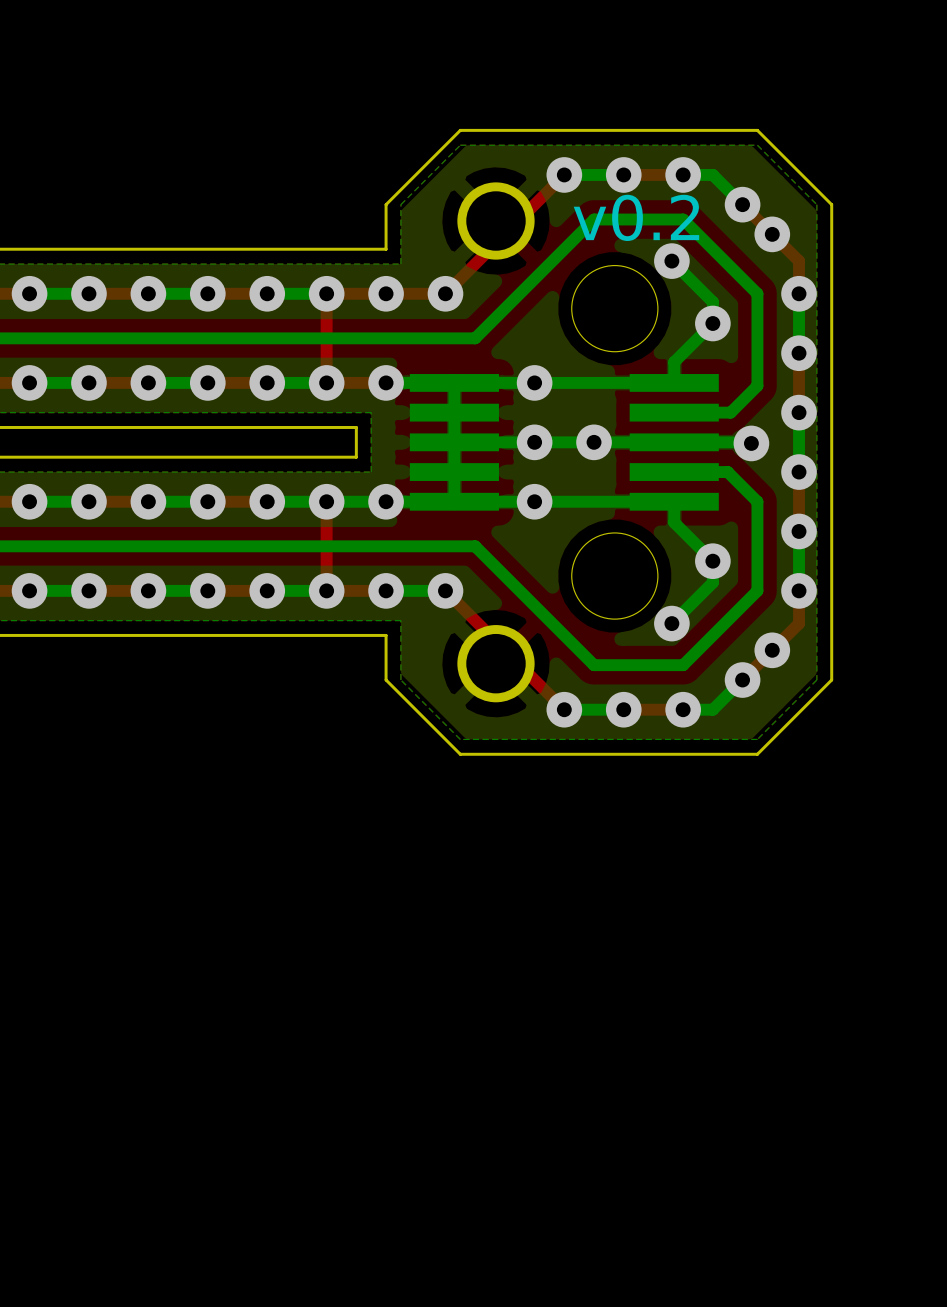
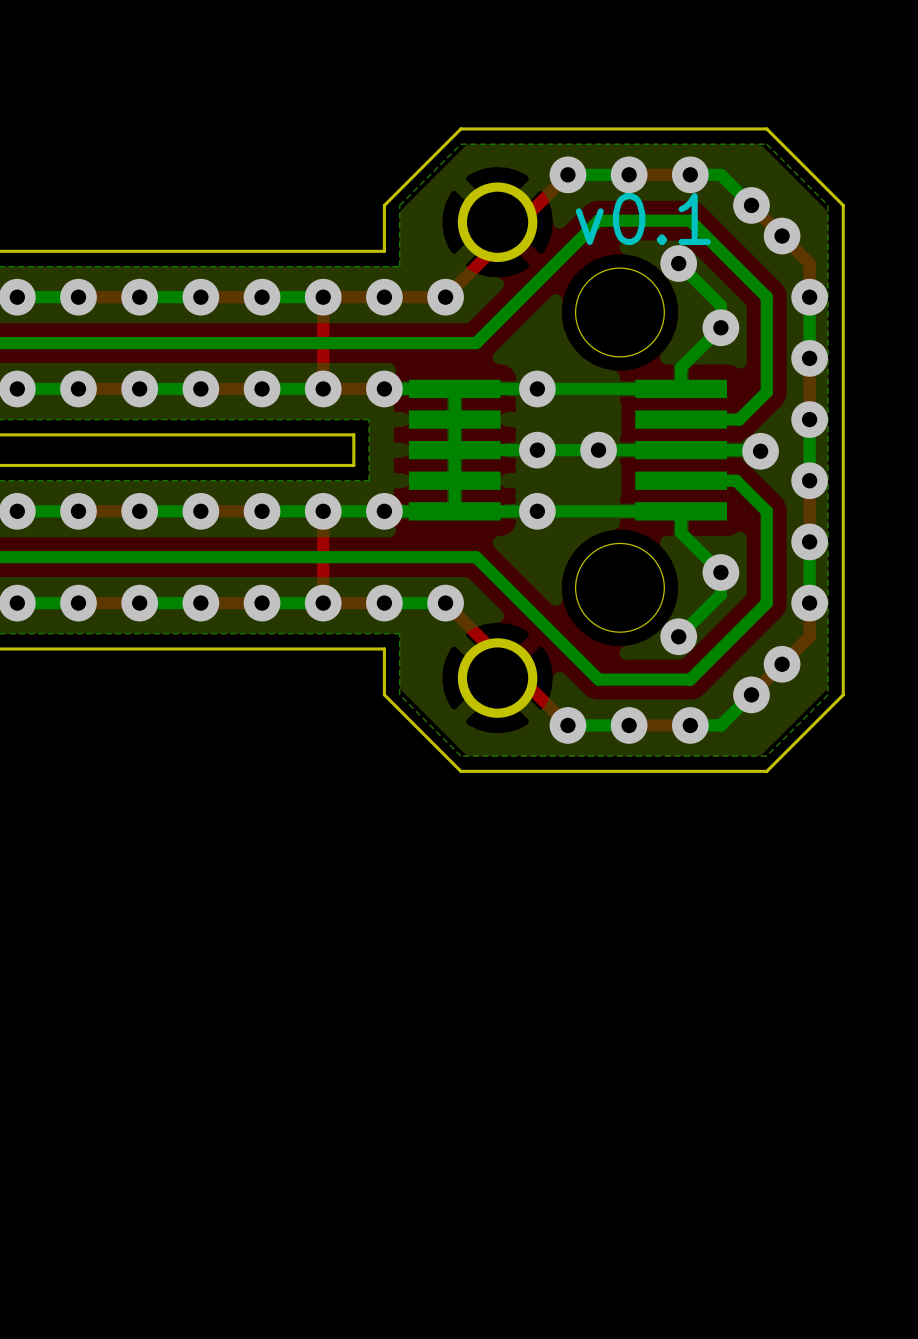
text: v0.2 (636, 217) -> v0.1 (643, 219)

